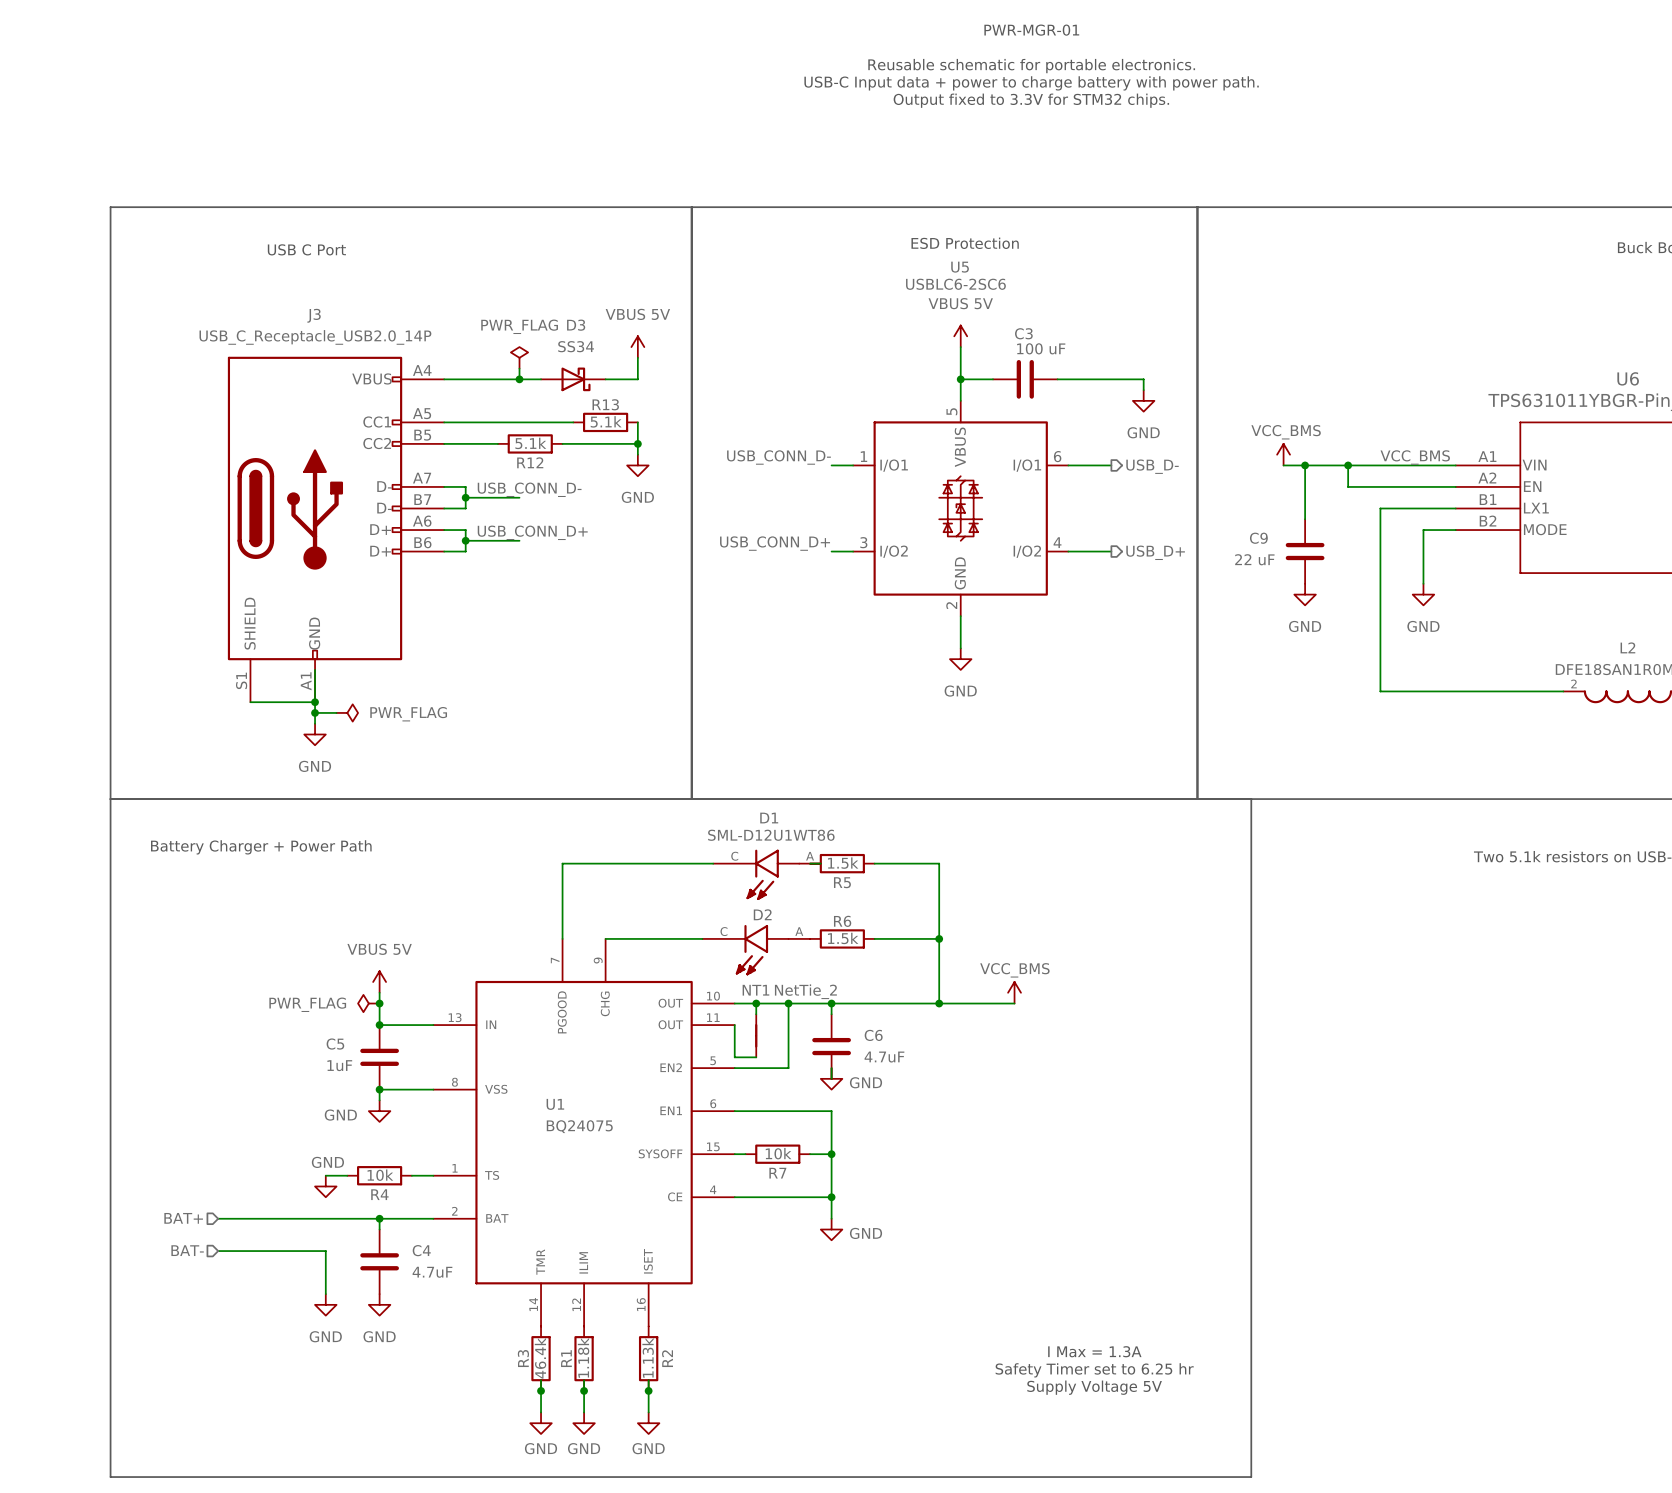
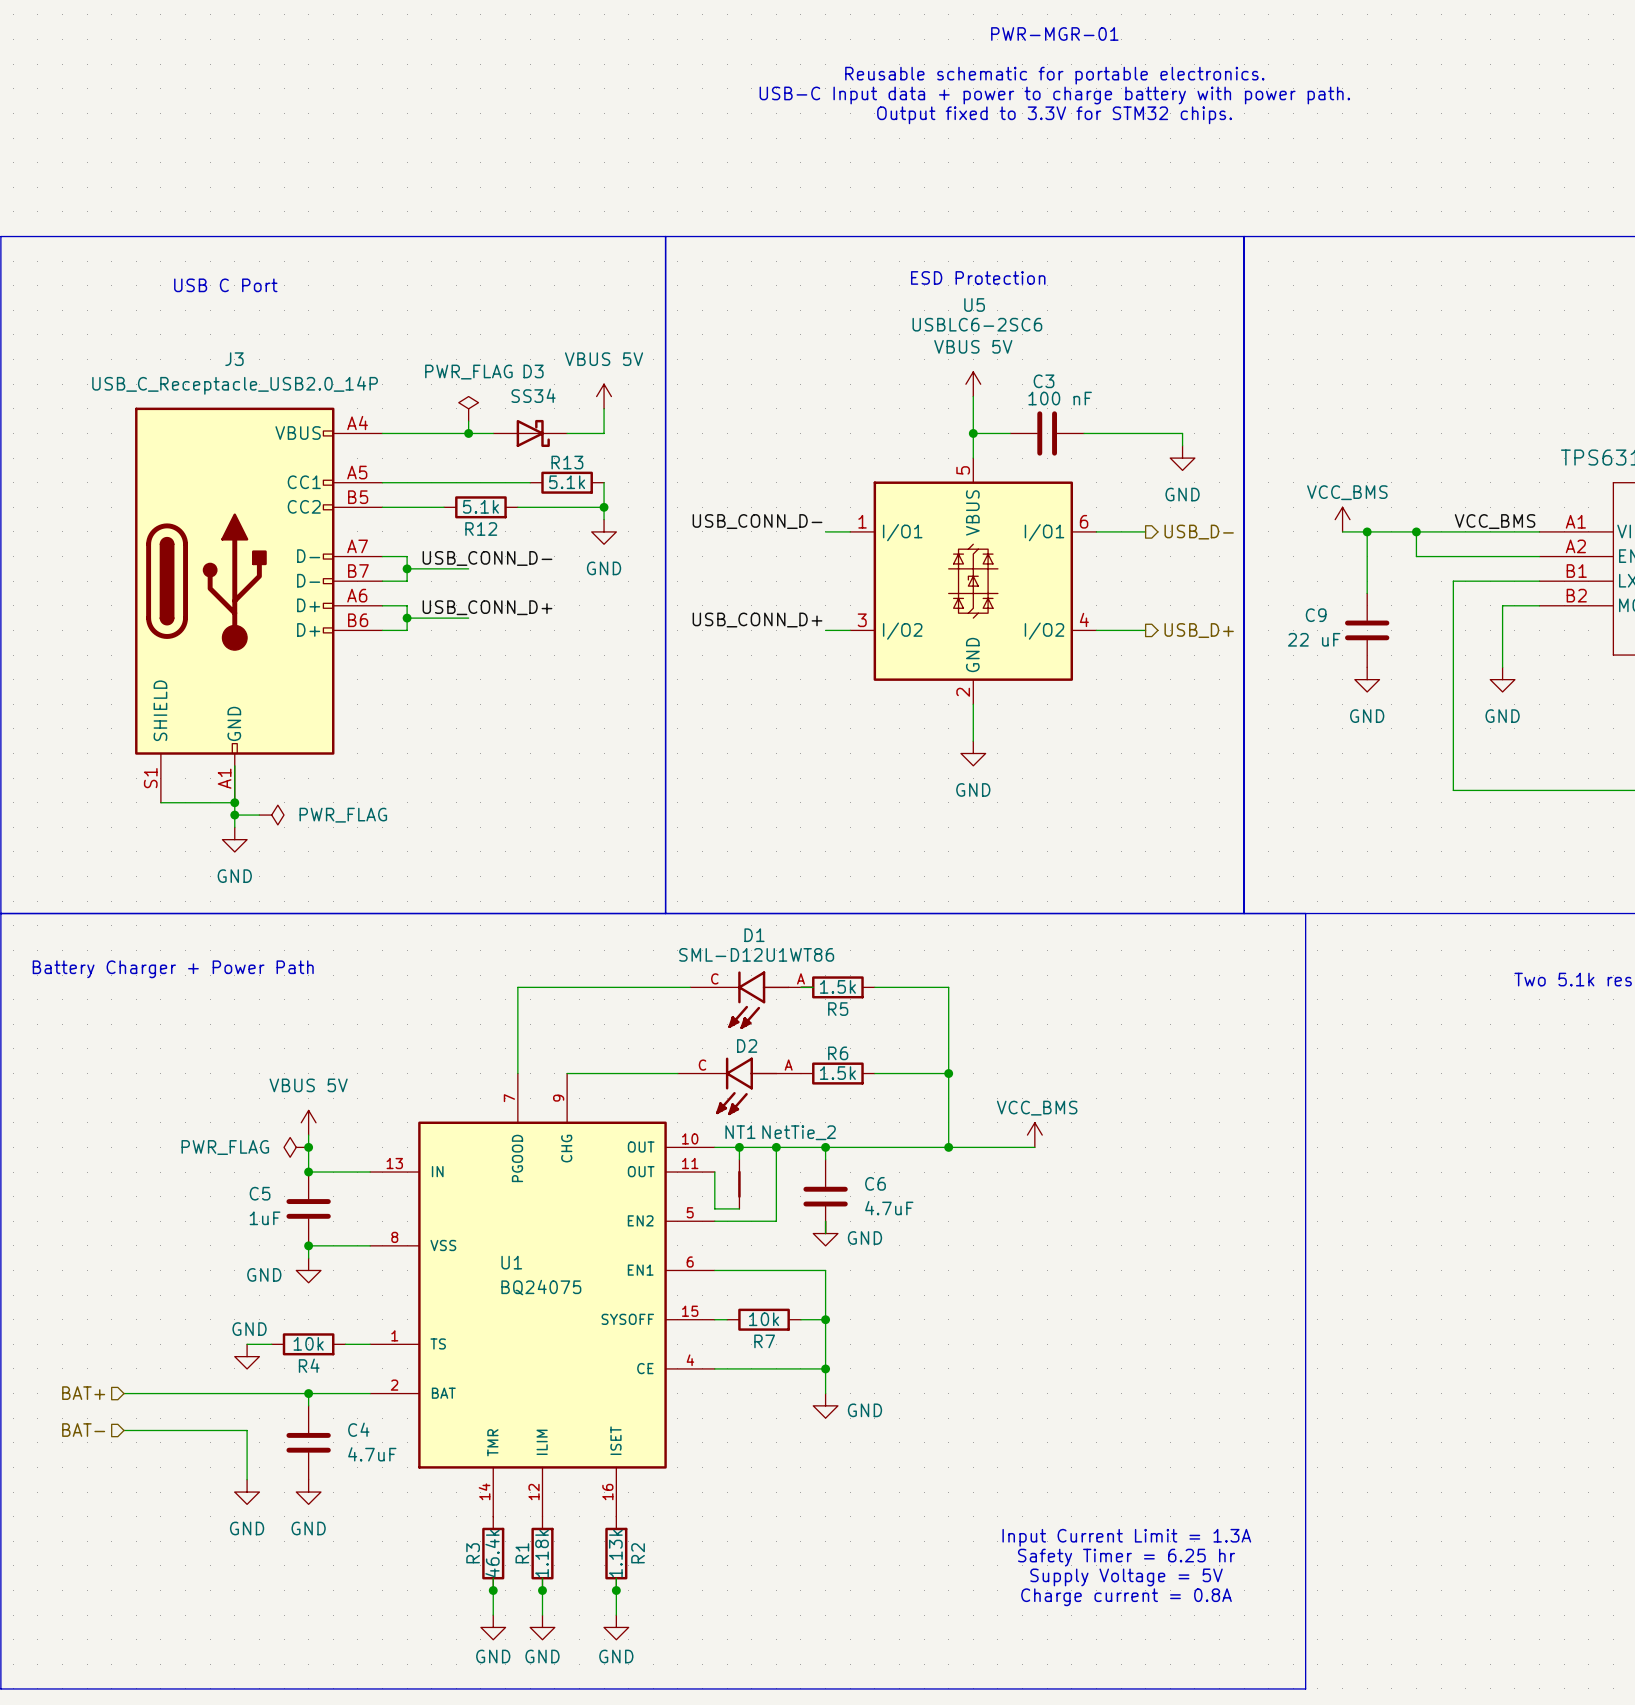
C3 value: 100 uF (1041, 348) -> 100 nF (1060, 398)
text: none -> Input Current Limit = 1.3A (1126, 1537)
text: I Max = 1.3A (1094, 1351) -> none
text: Safety Timer set to 6.25 hr (1094, 1370) -> Safety Timer = 6.25 hr (1126, 1557)
text: Supply Voltage 5V (1094, 1387) -> Supply Voltage = 5V (1126, 1577)
text: none -> Charge current = 0.8A (1126, 1597)

